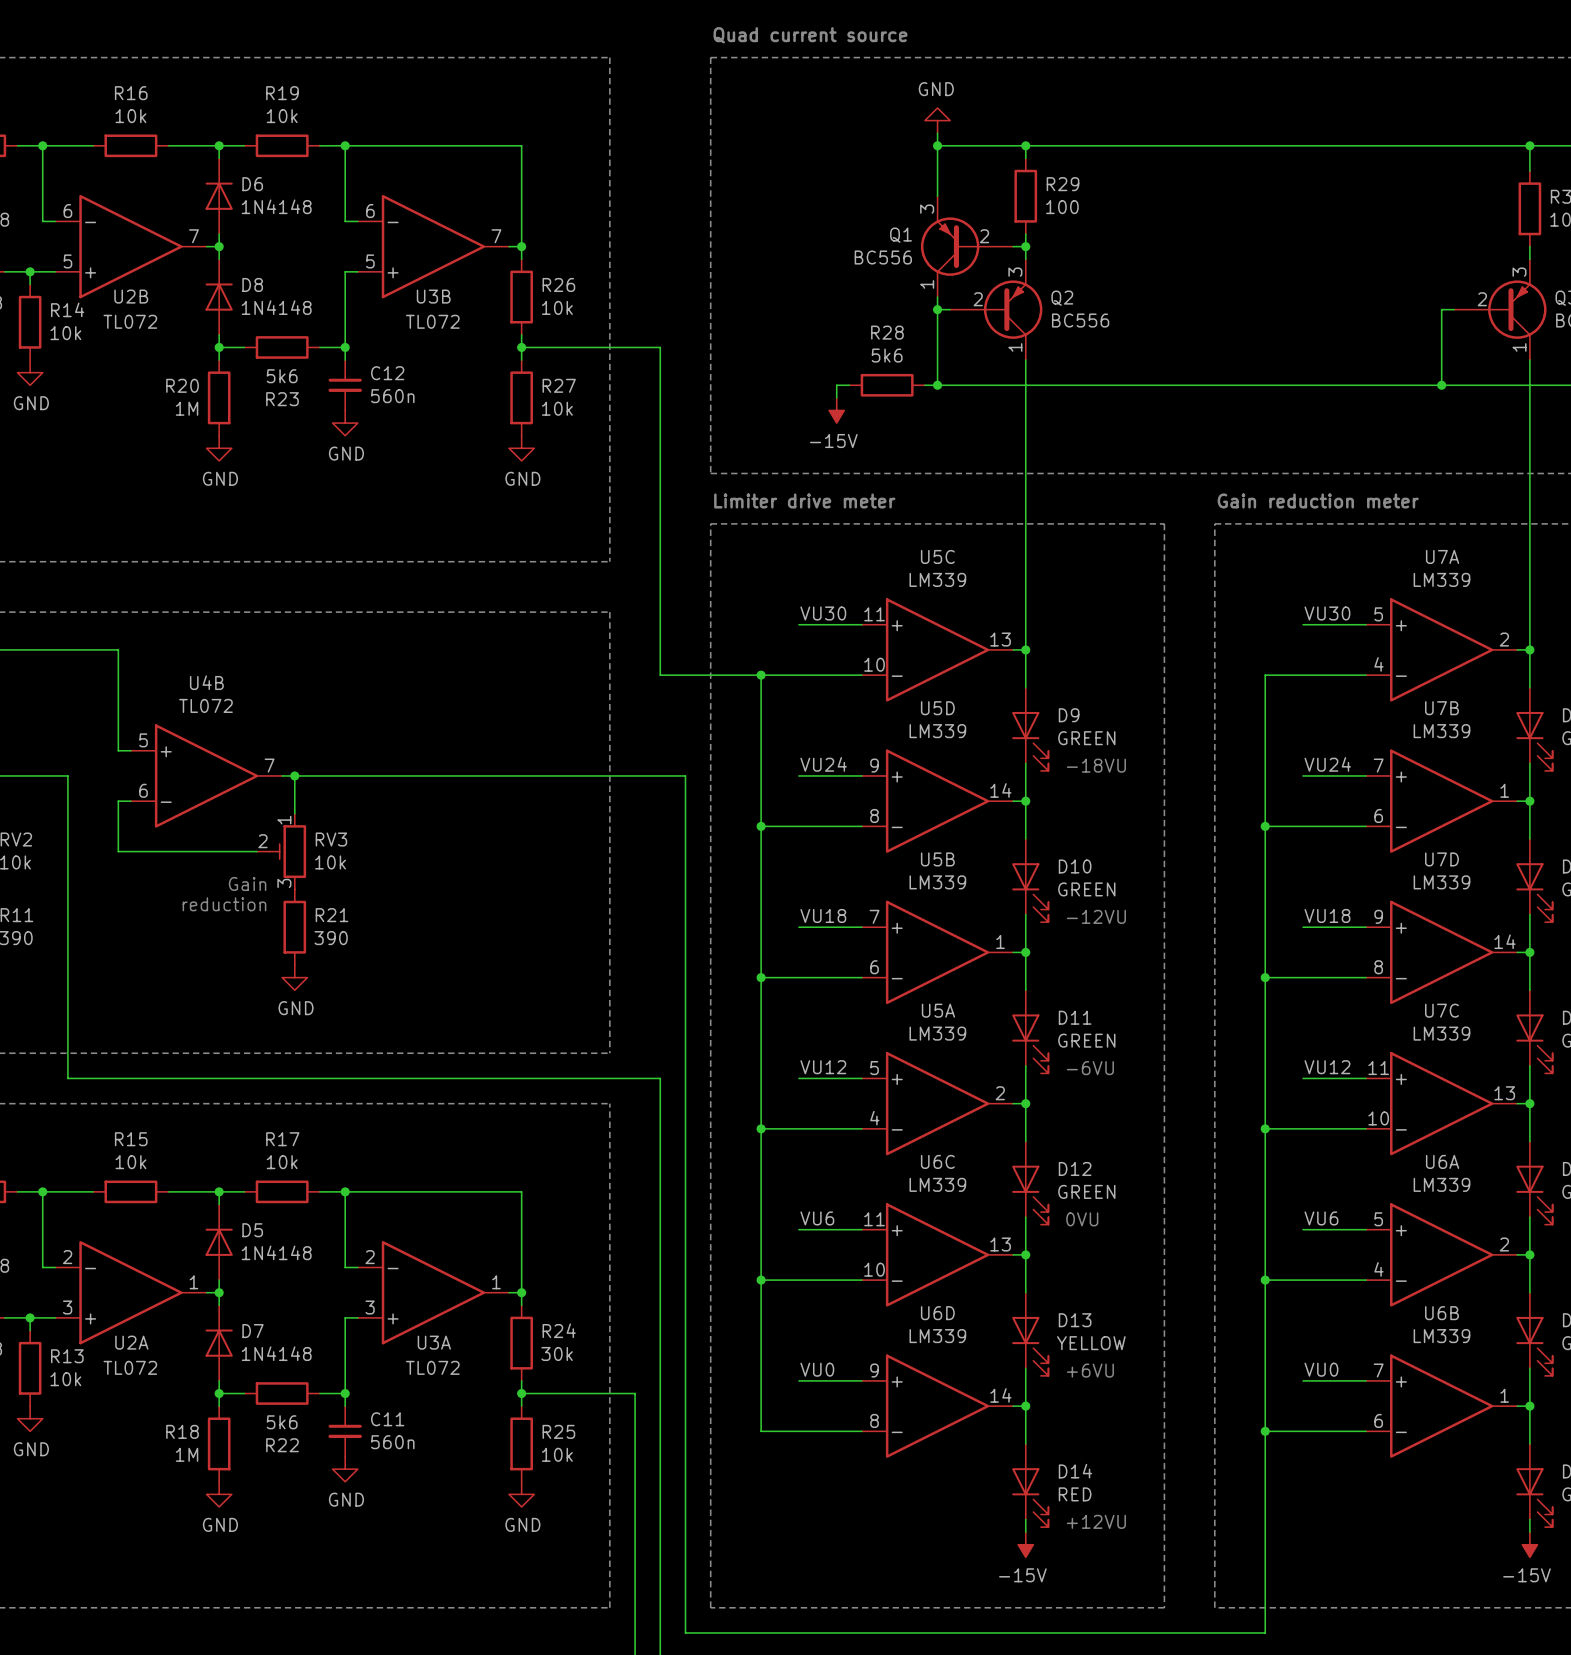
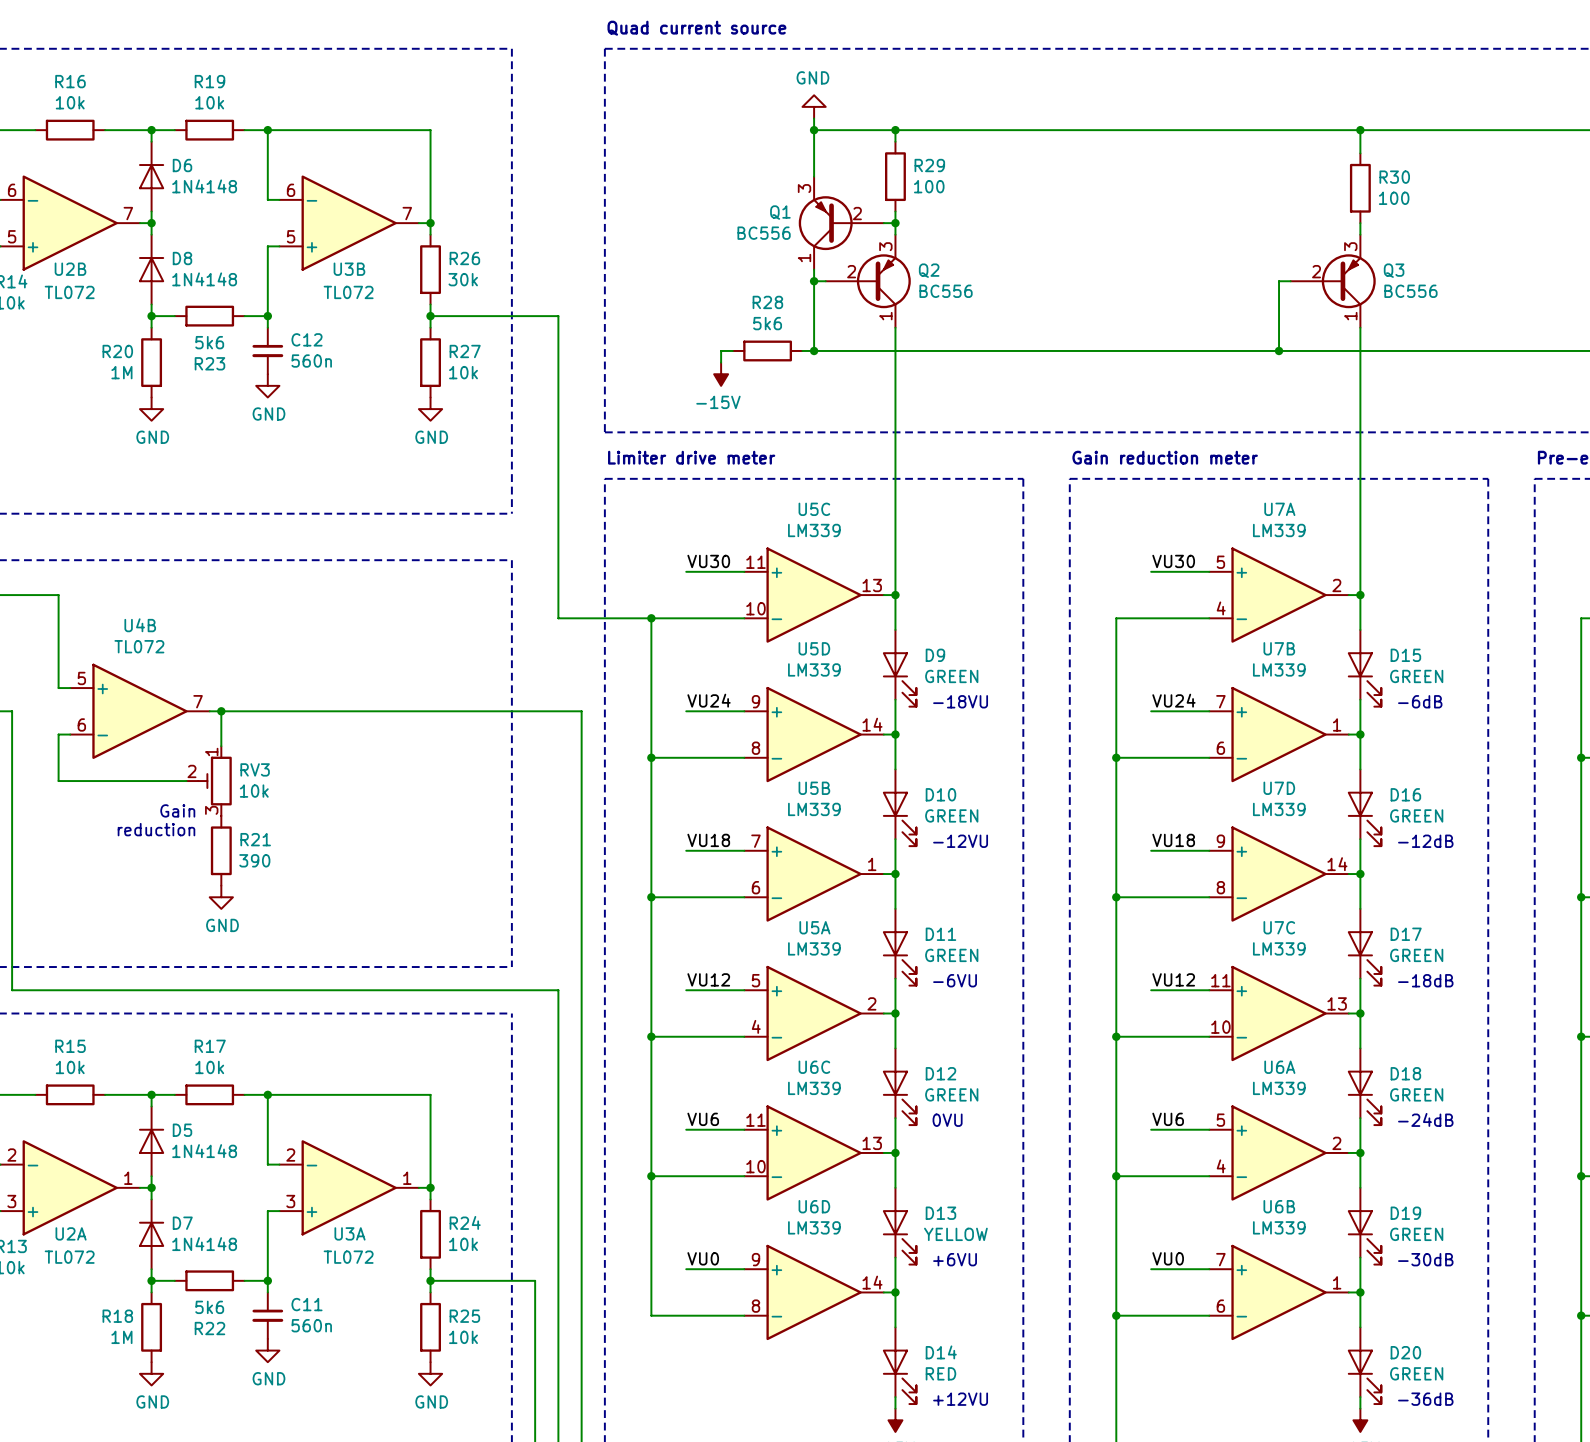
R26 value: 10k (557, 307) -> 30k (463, 279)
R24 value: 30k (557, 1353) -> 10k (463, 1244)

